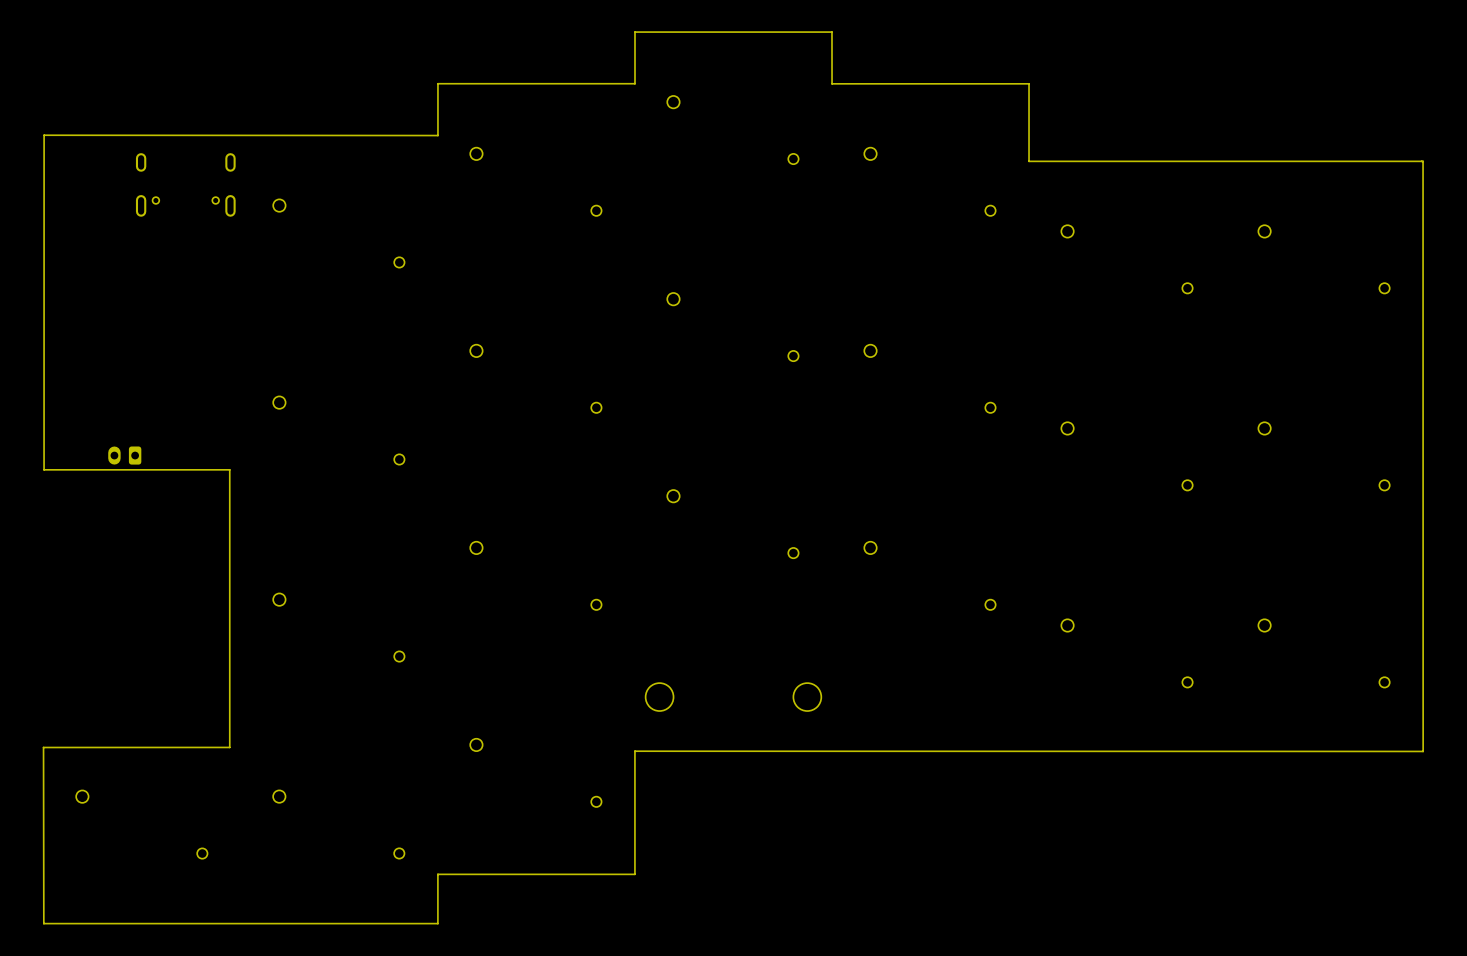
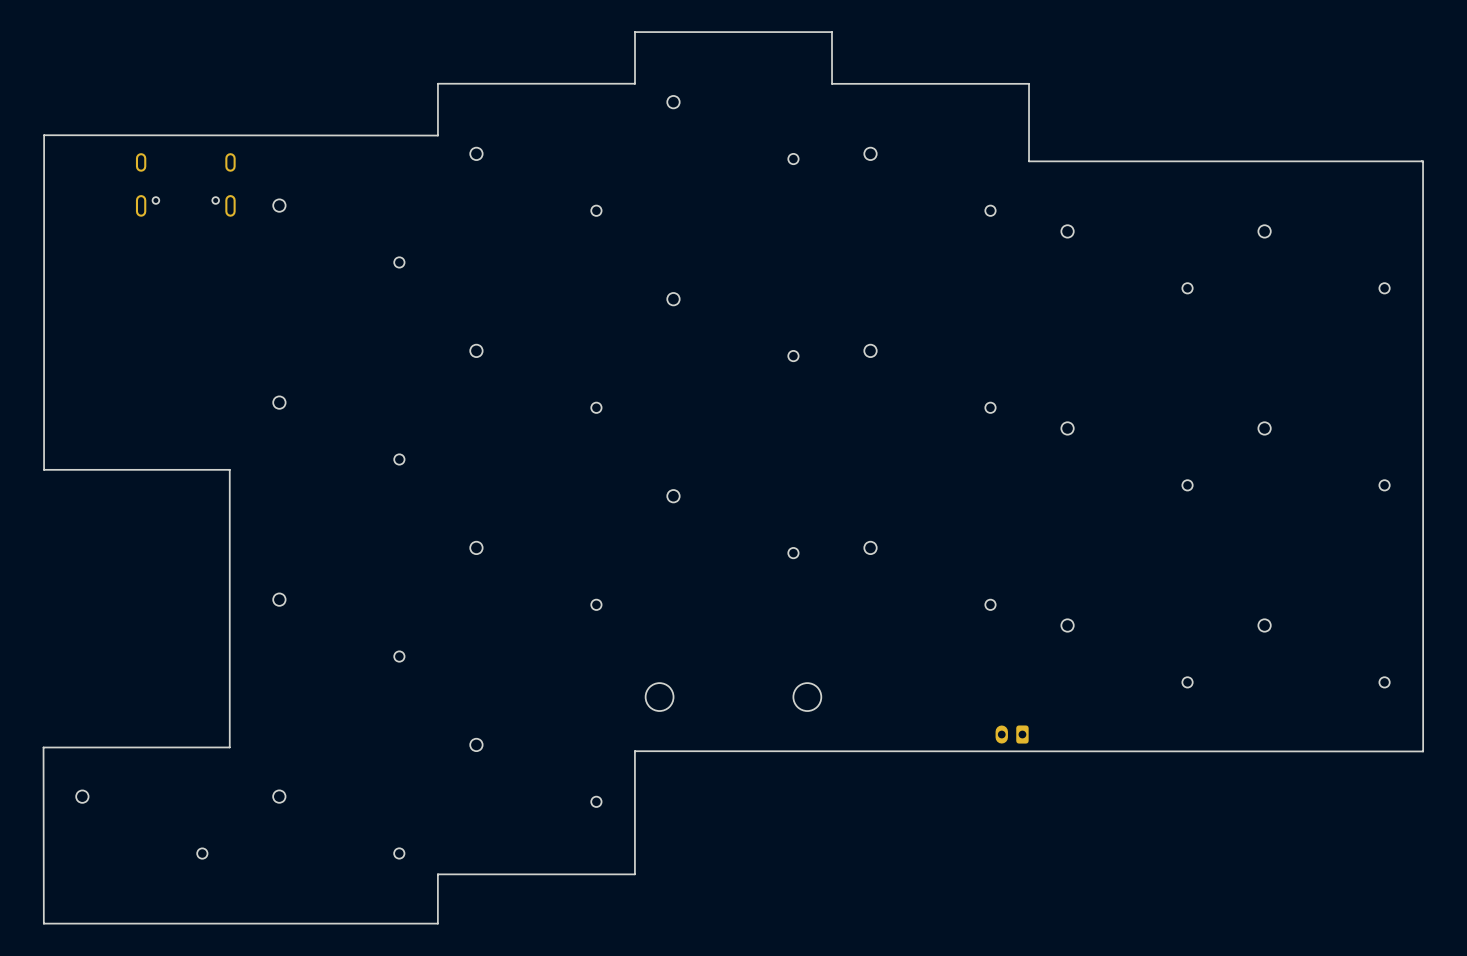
part: (124, 455) -> none
part: none -> (1012, 734)

